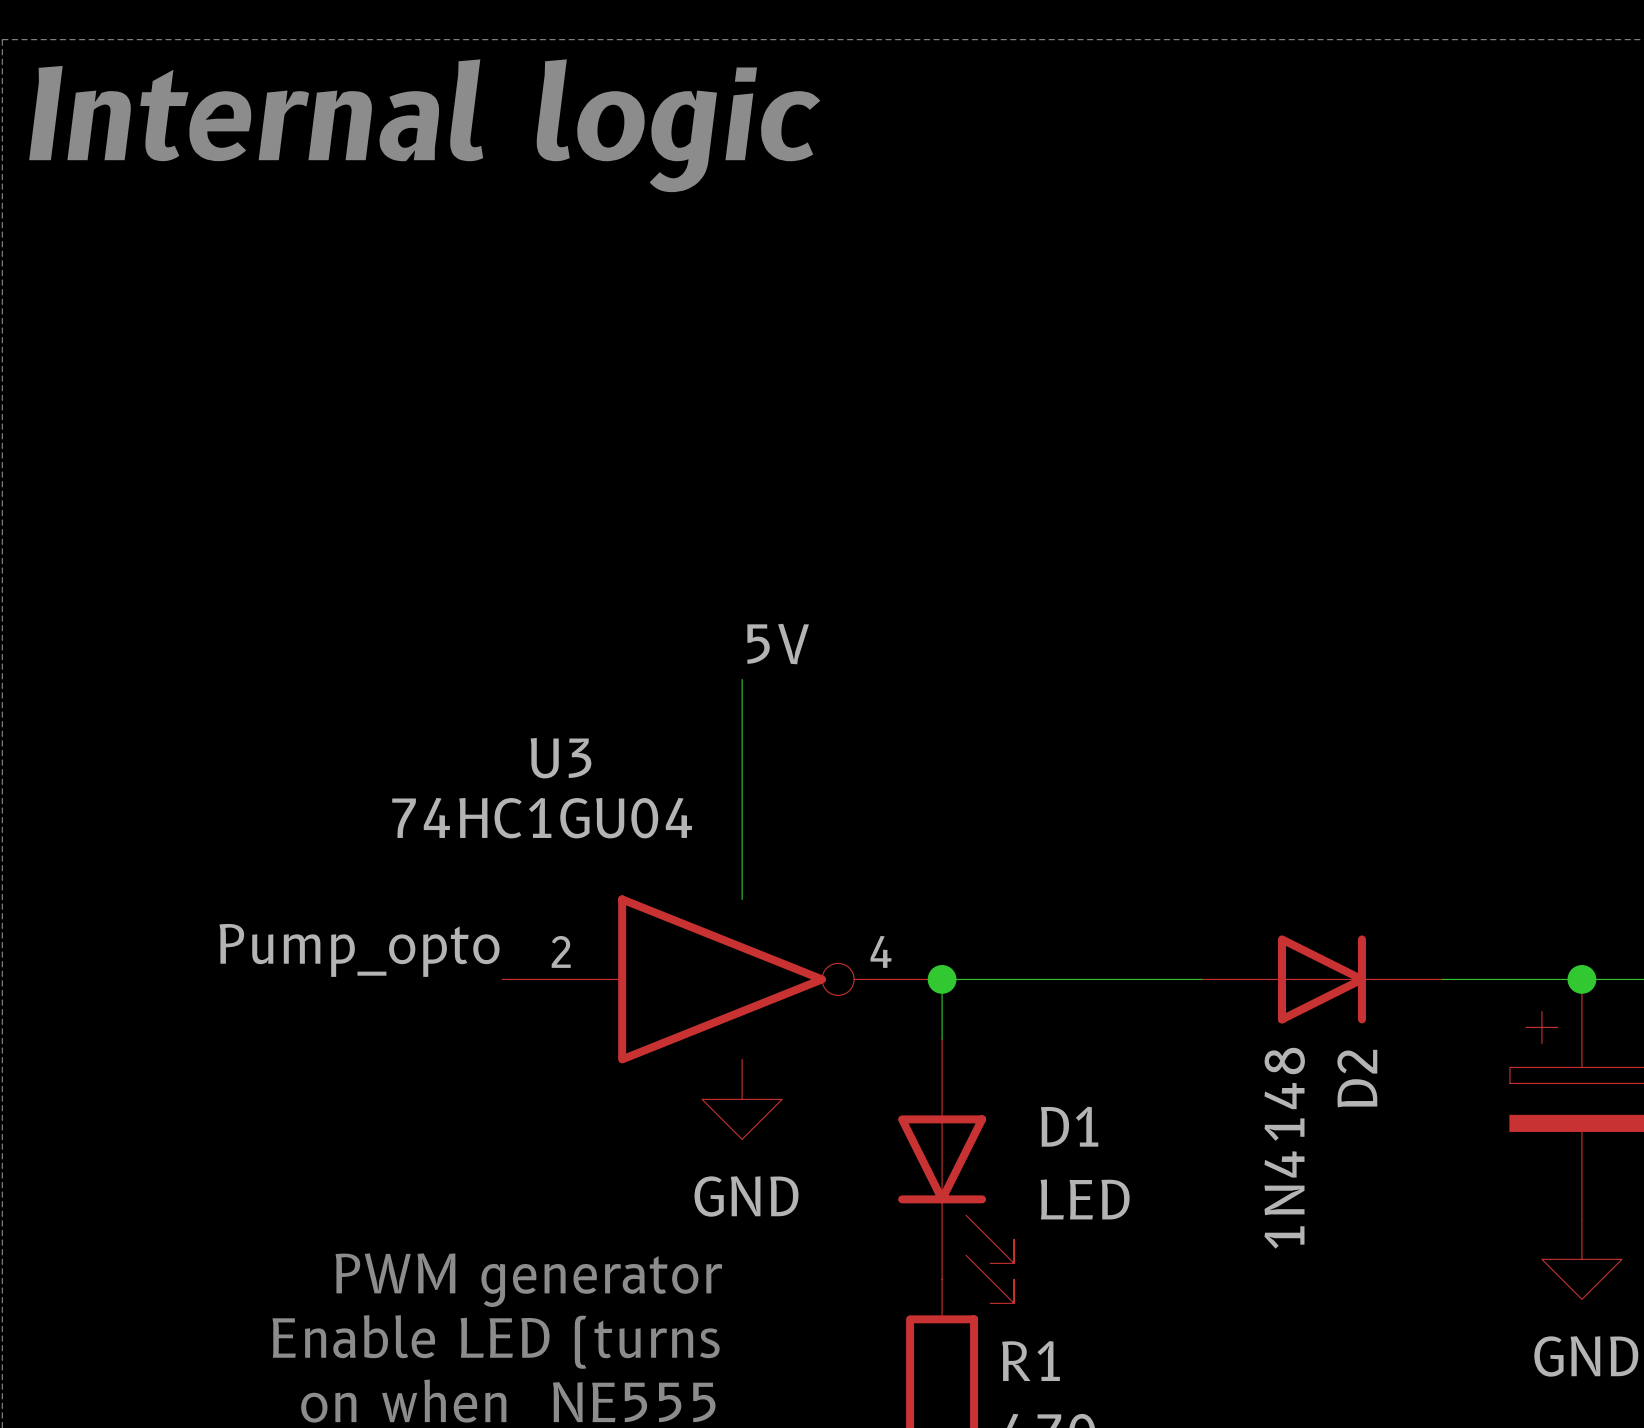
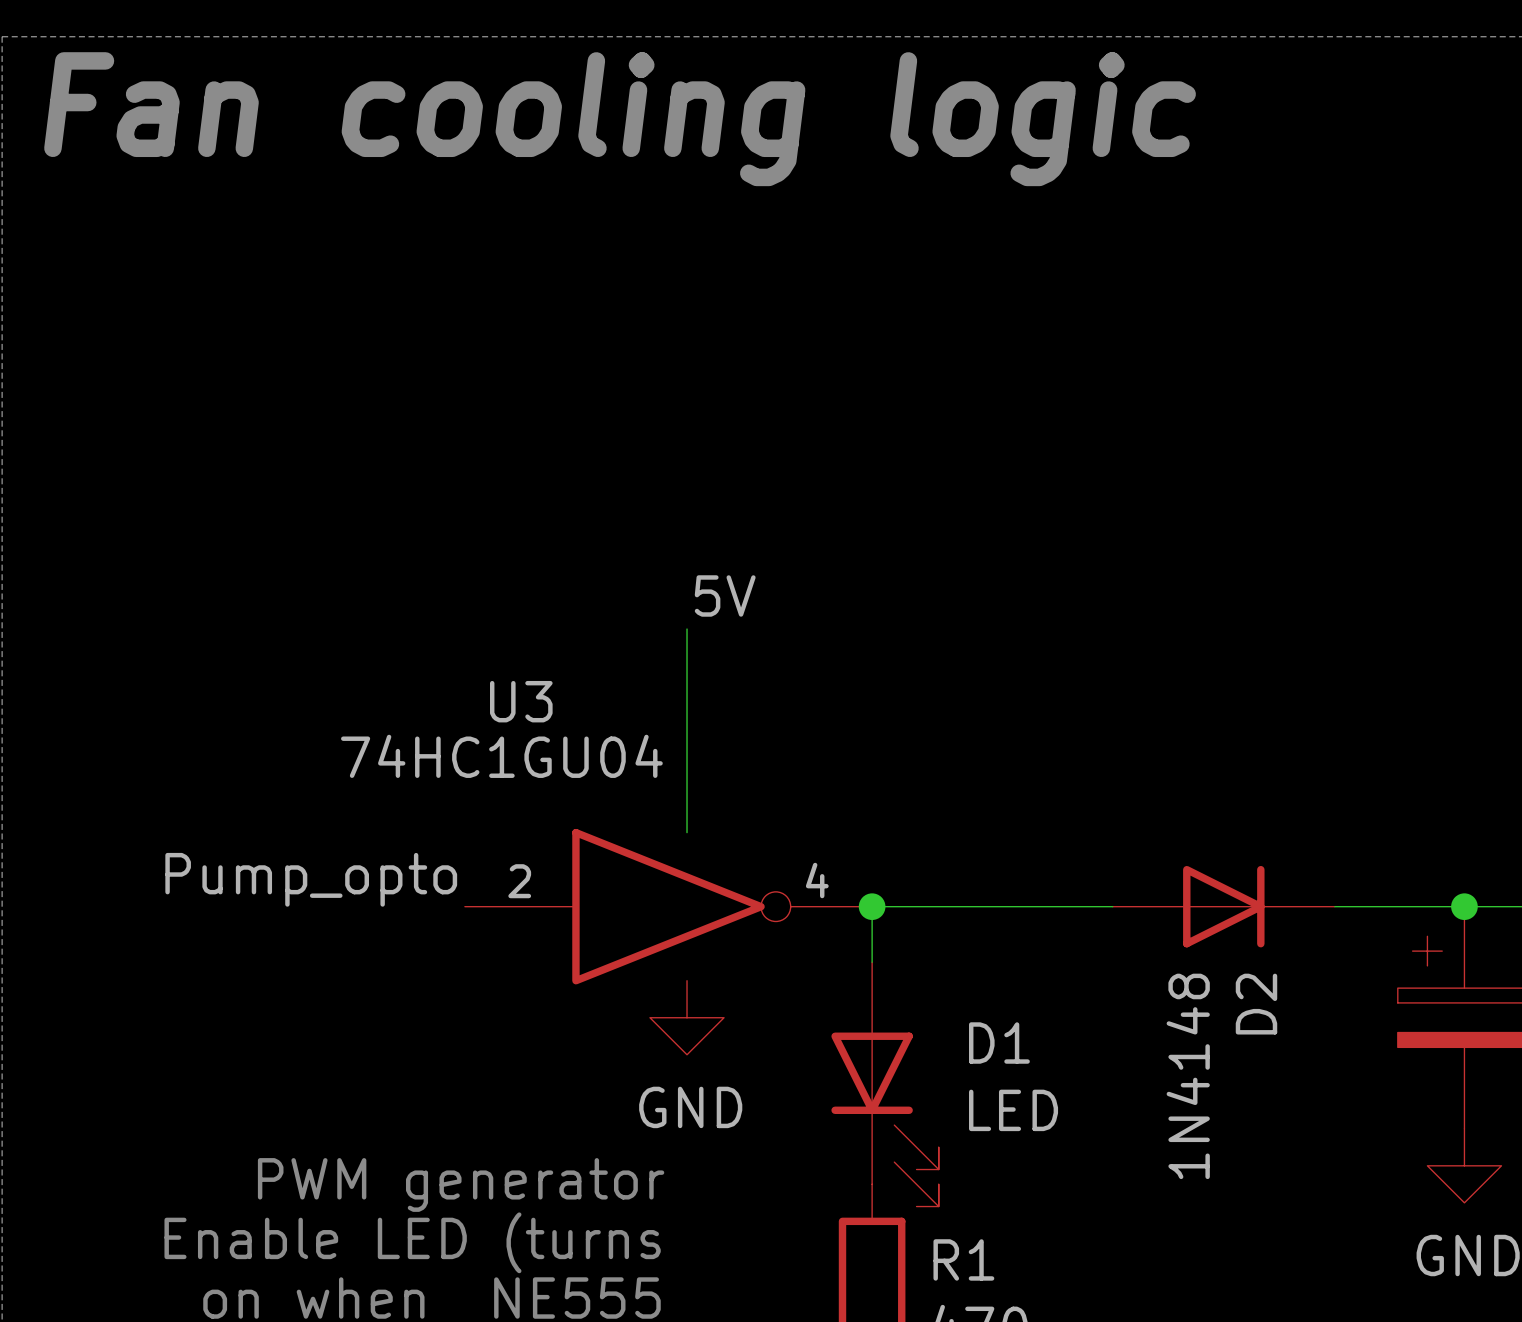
text: Internal logic (424, 125) -> Fan cooling logic (620, 119)

